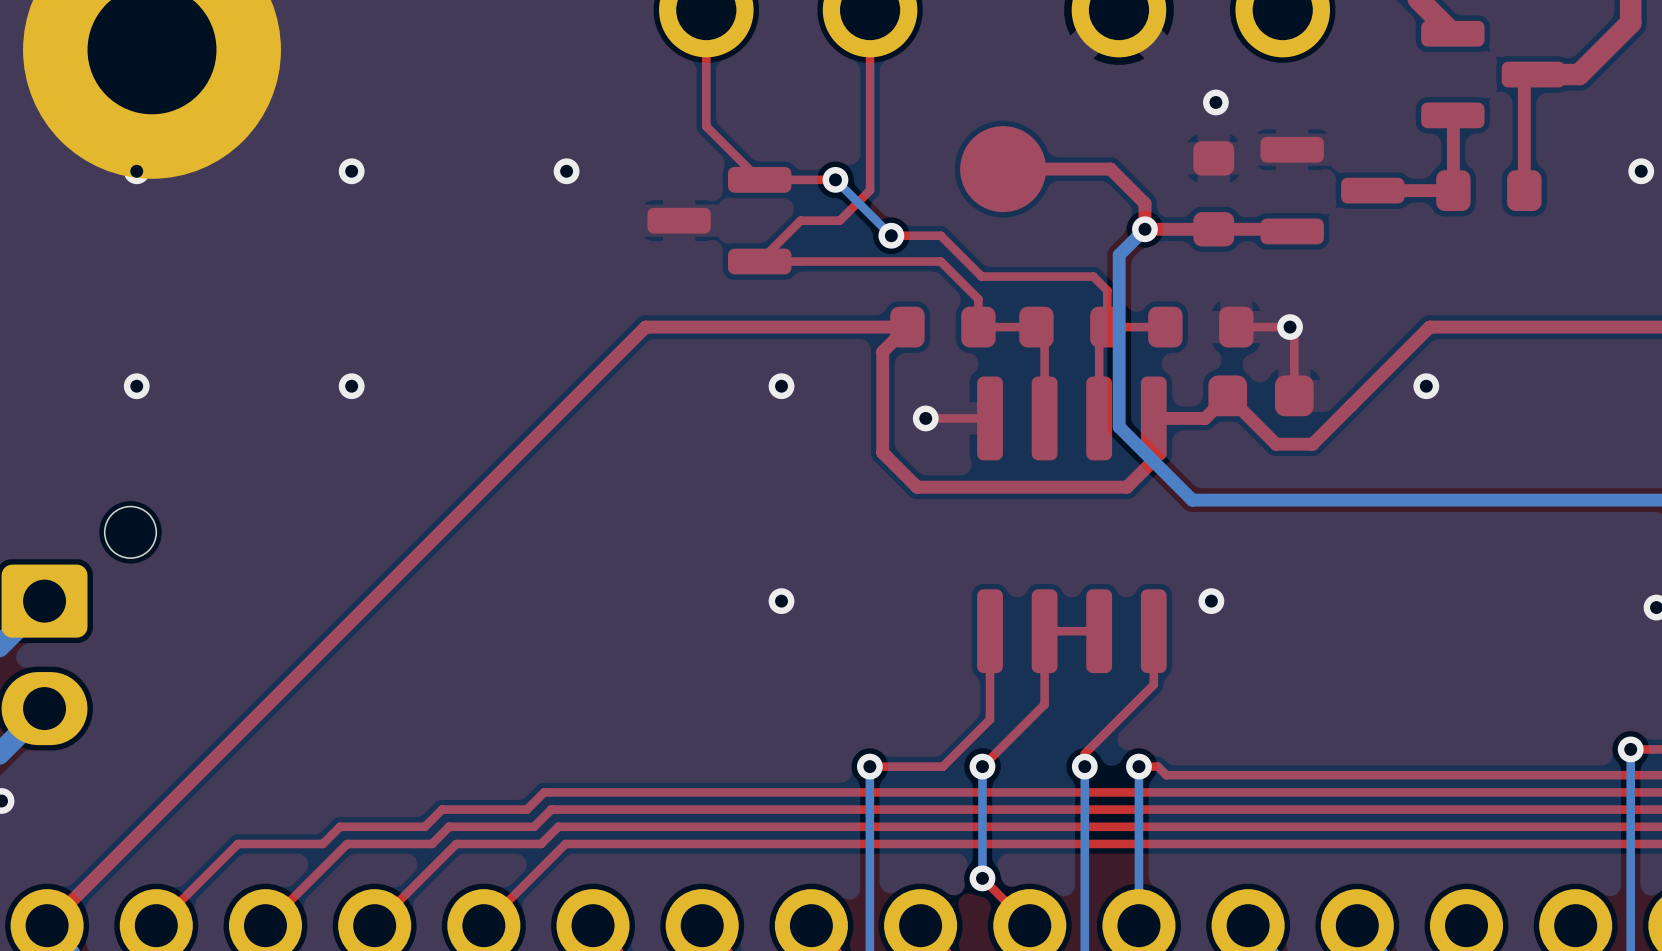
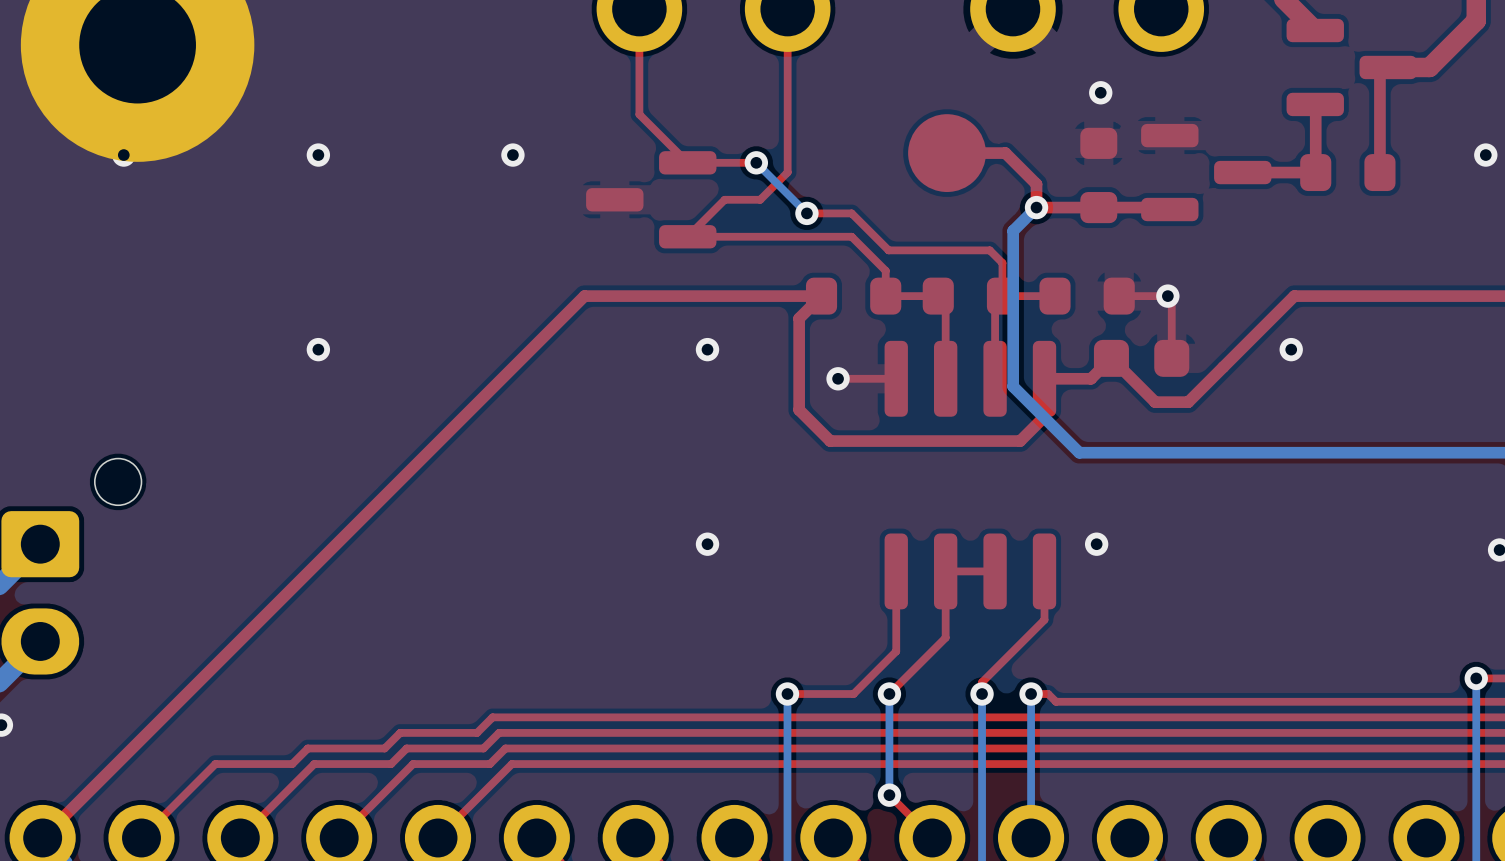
part position: (1003, 169) -> (947, 153)
via: (136, 386) -> none

